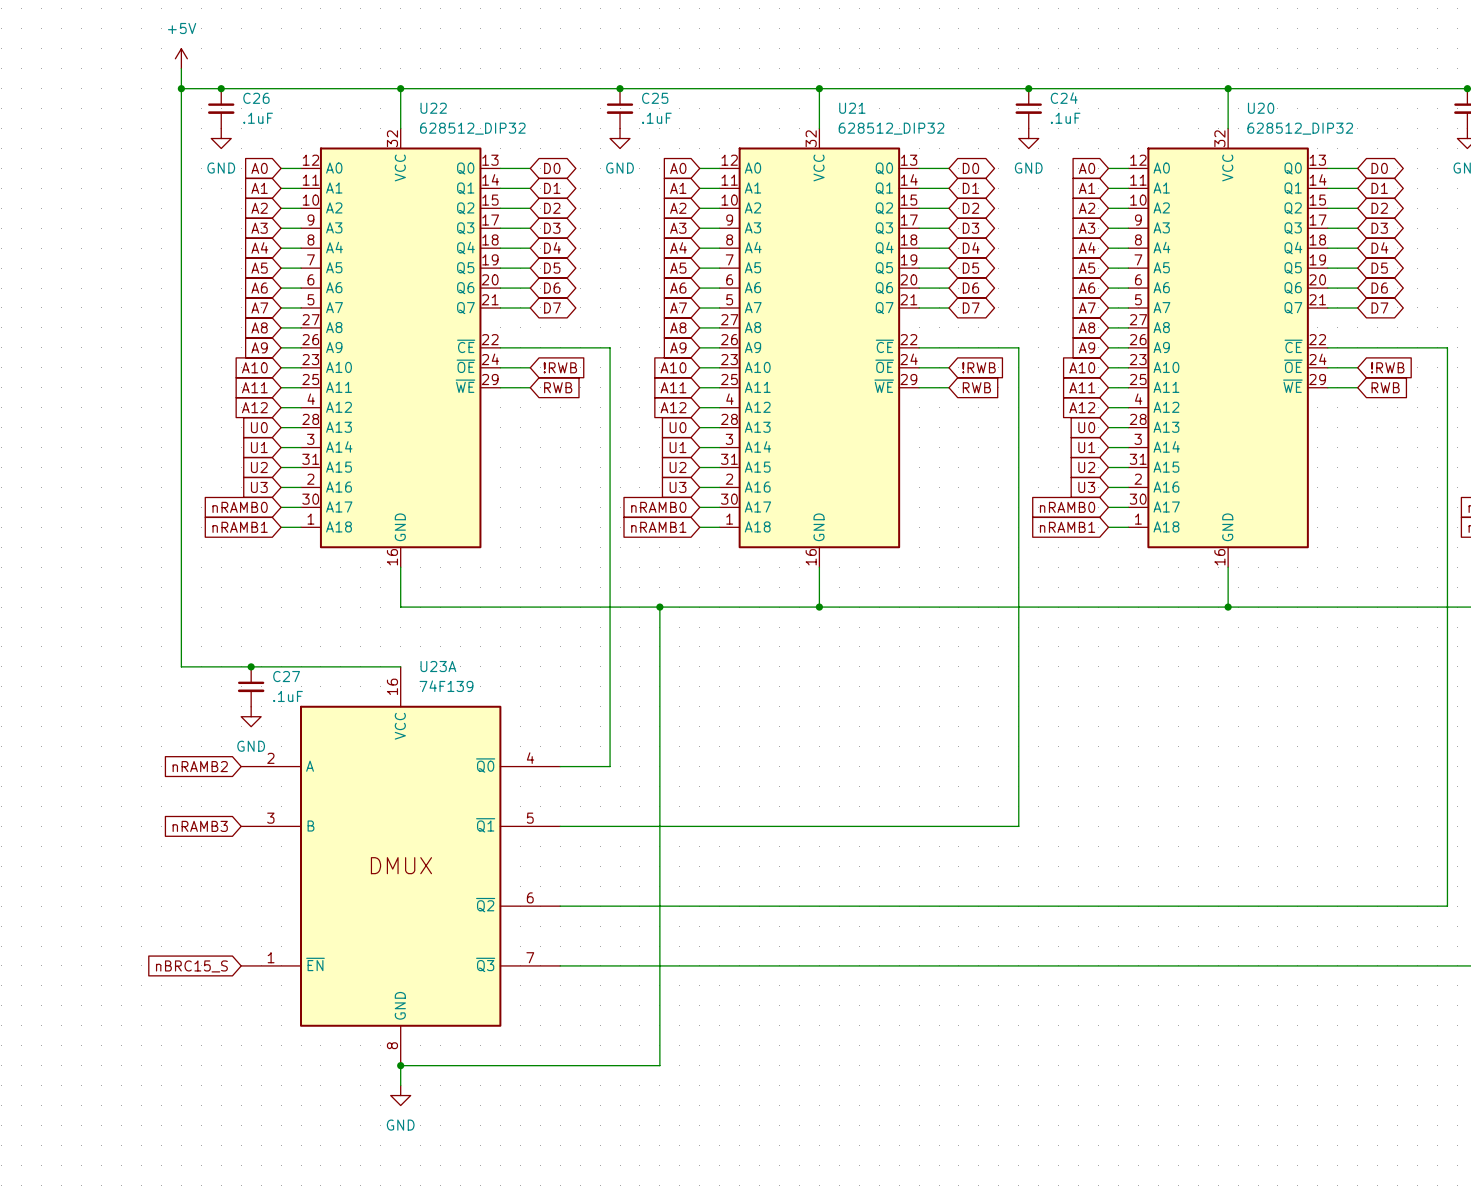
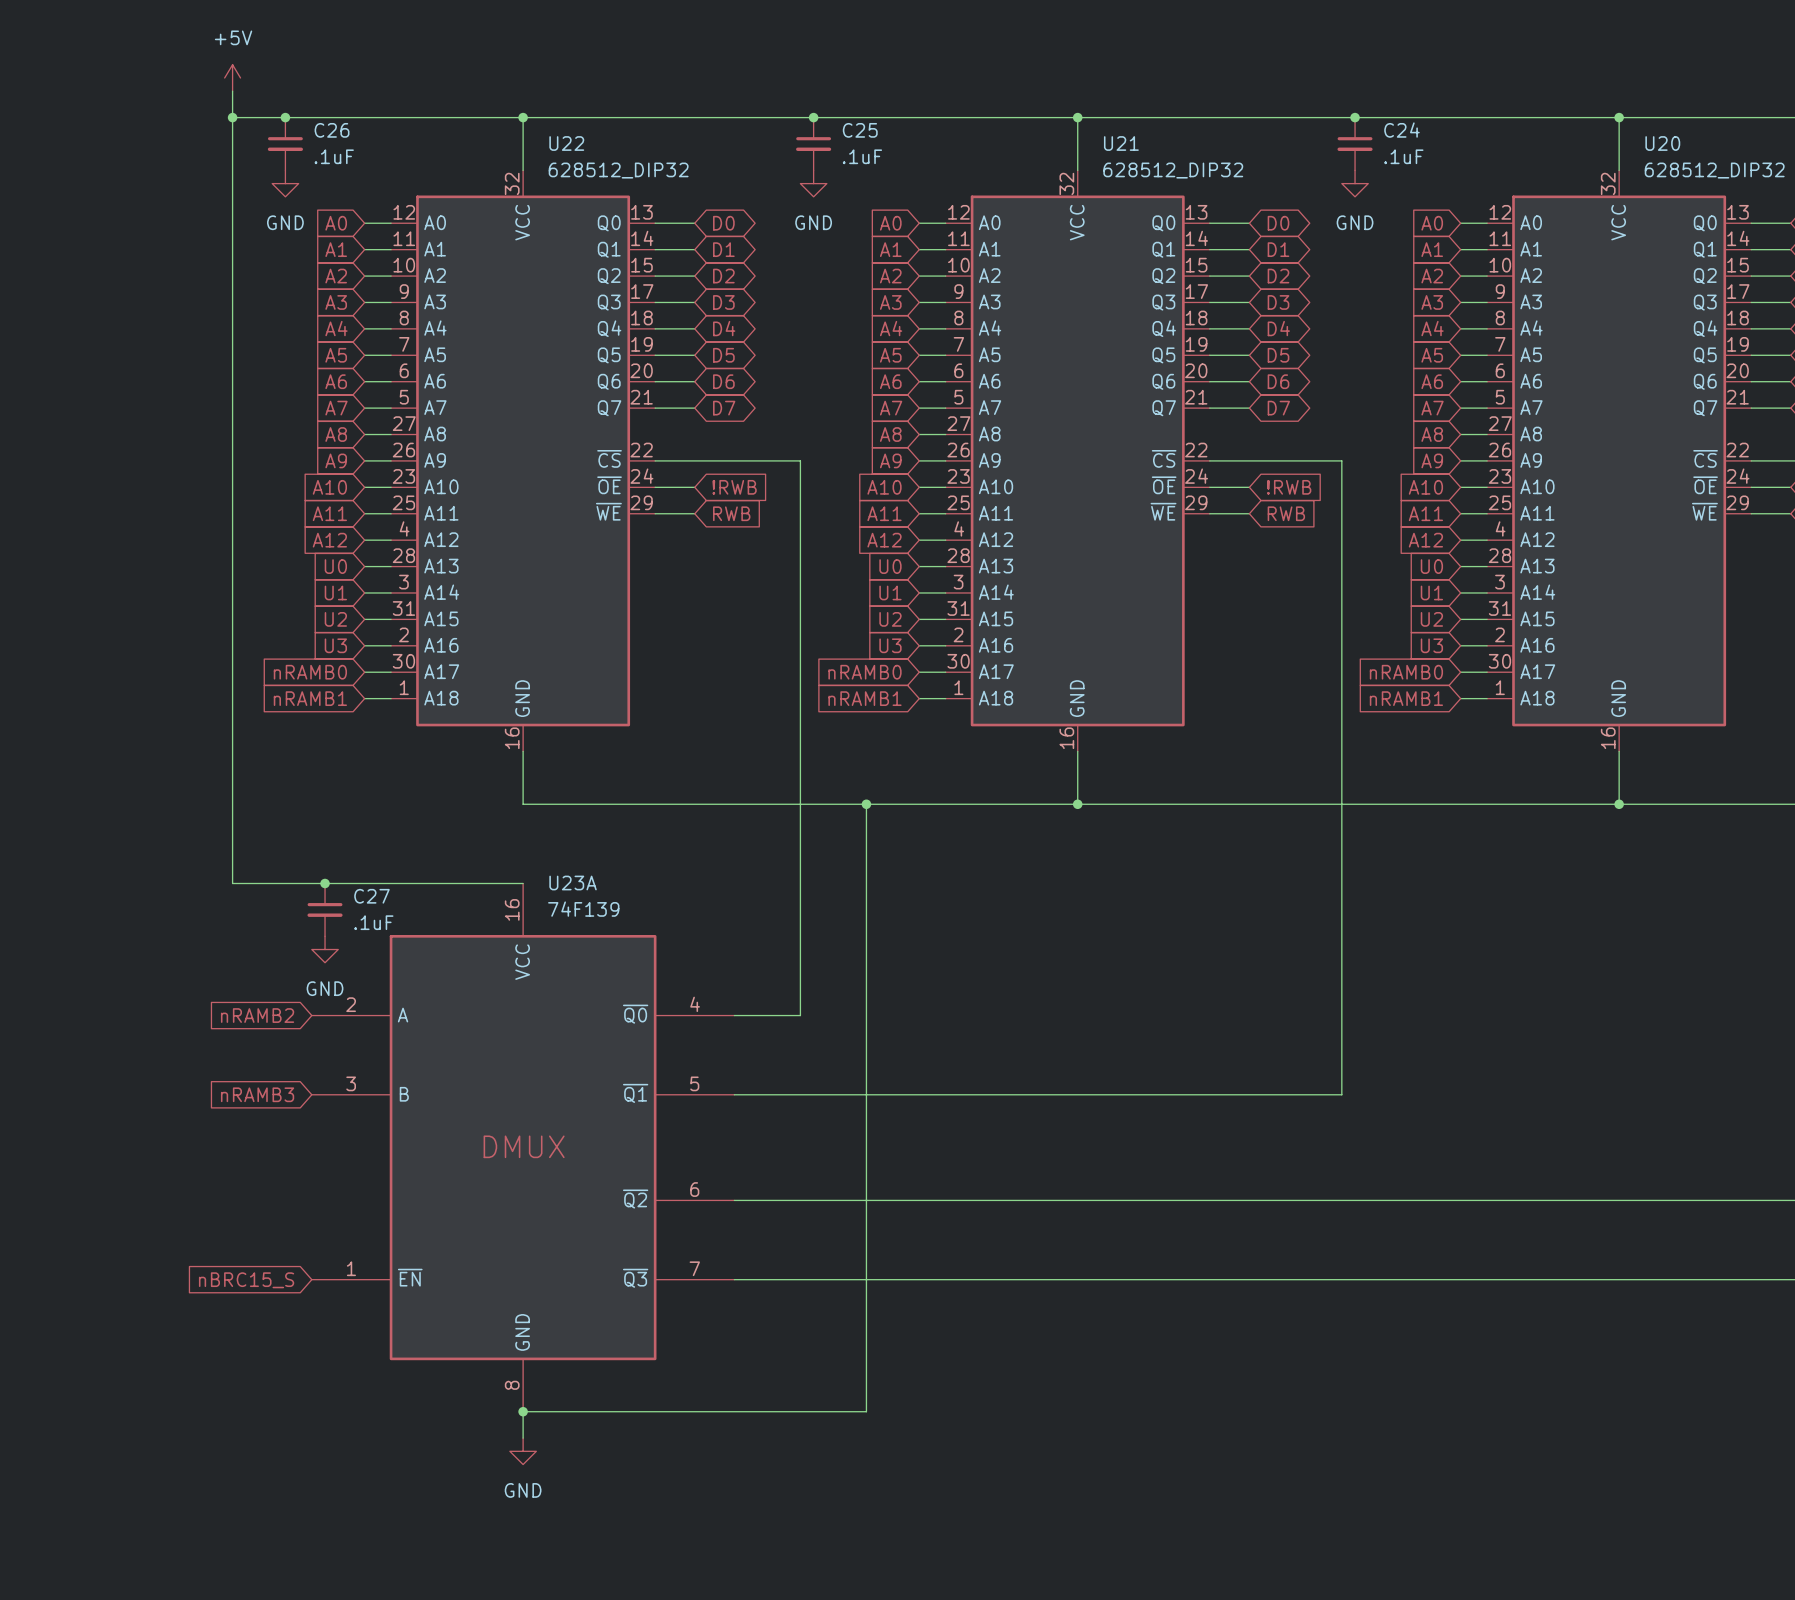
U22 pin name: ~{CE} (466, 346) -> ~{CS} (609, 458)
U21 pin name: ~{CE} (884, 346) -> ~{CS} (1164, 458)
U20 pin name: ~{CE} (1293, 346) -> ~{CS} (1705, 458)

